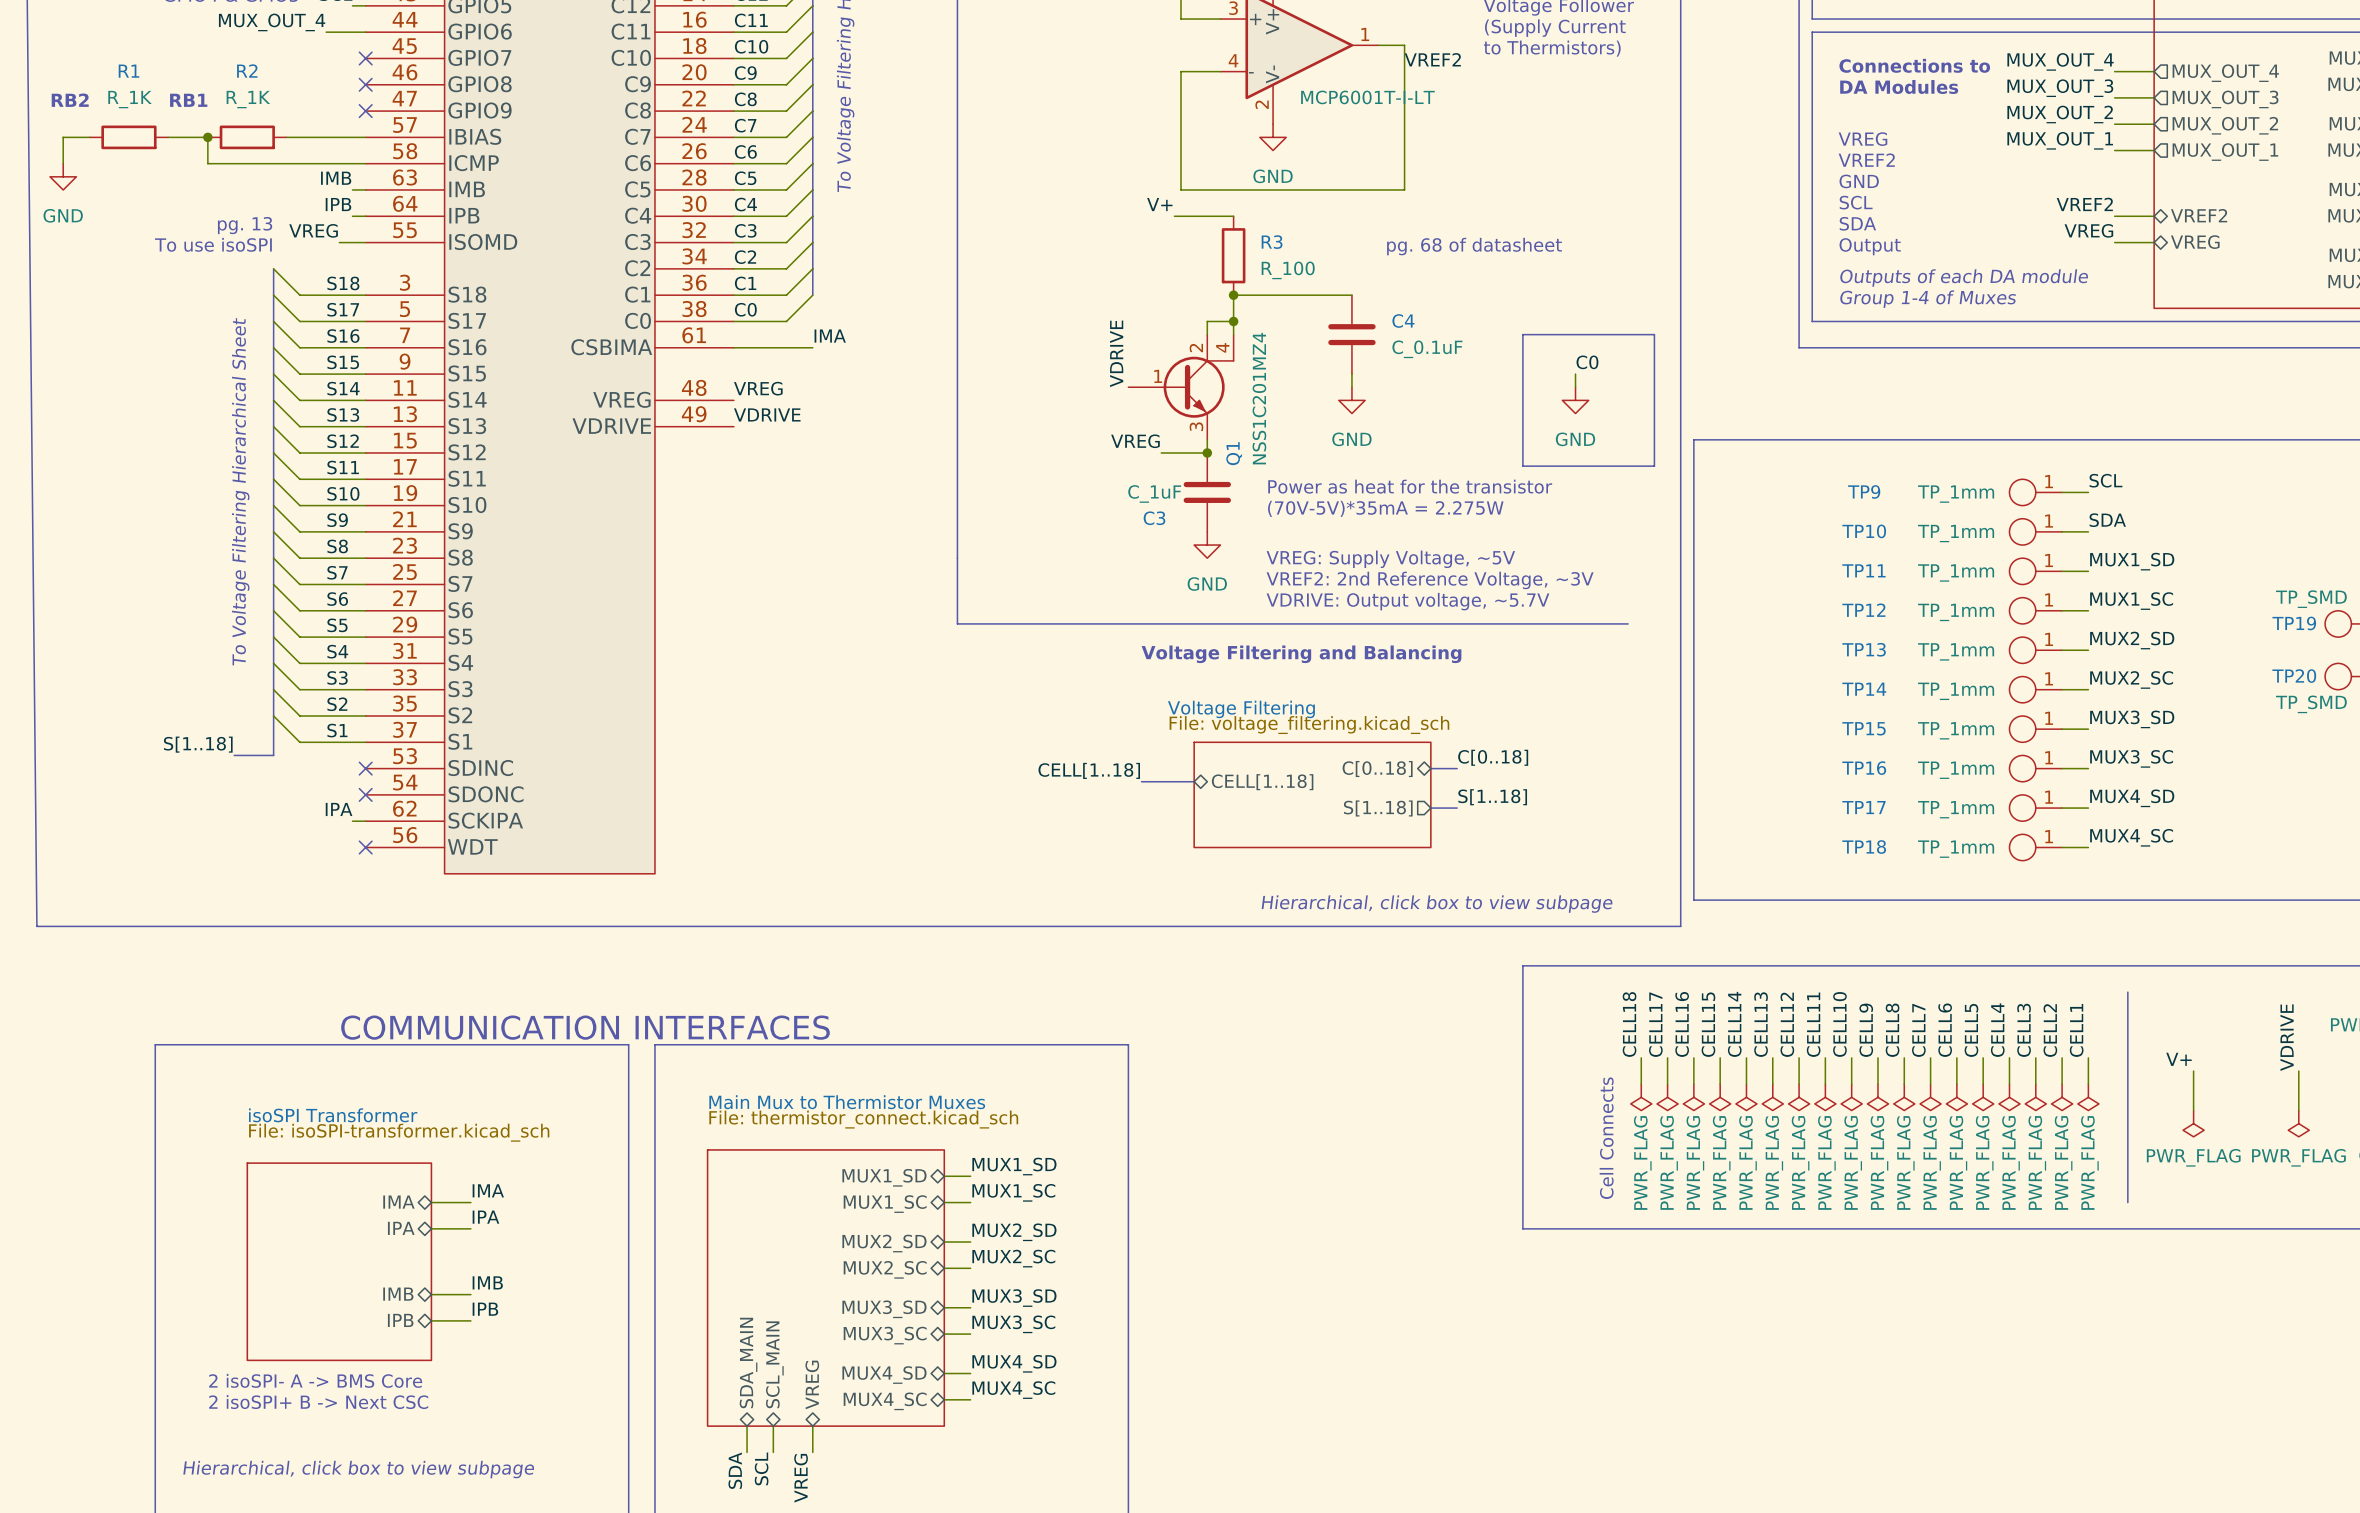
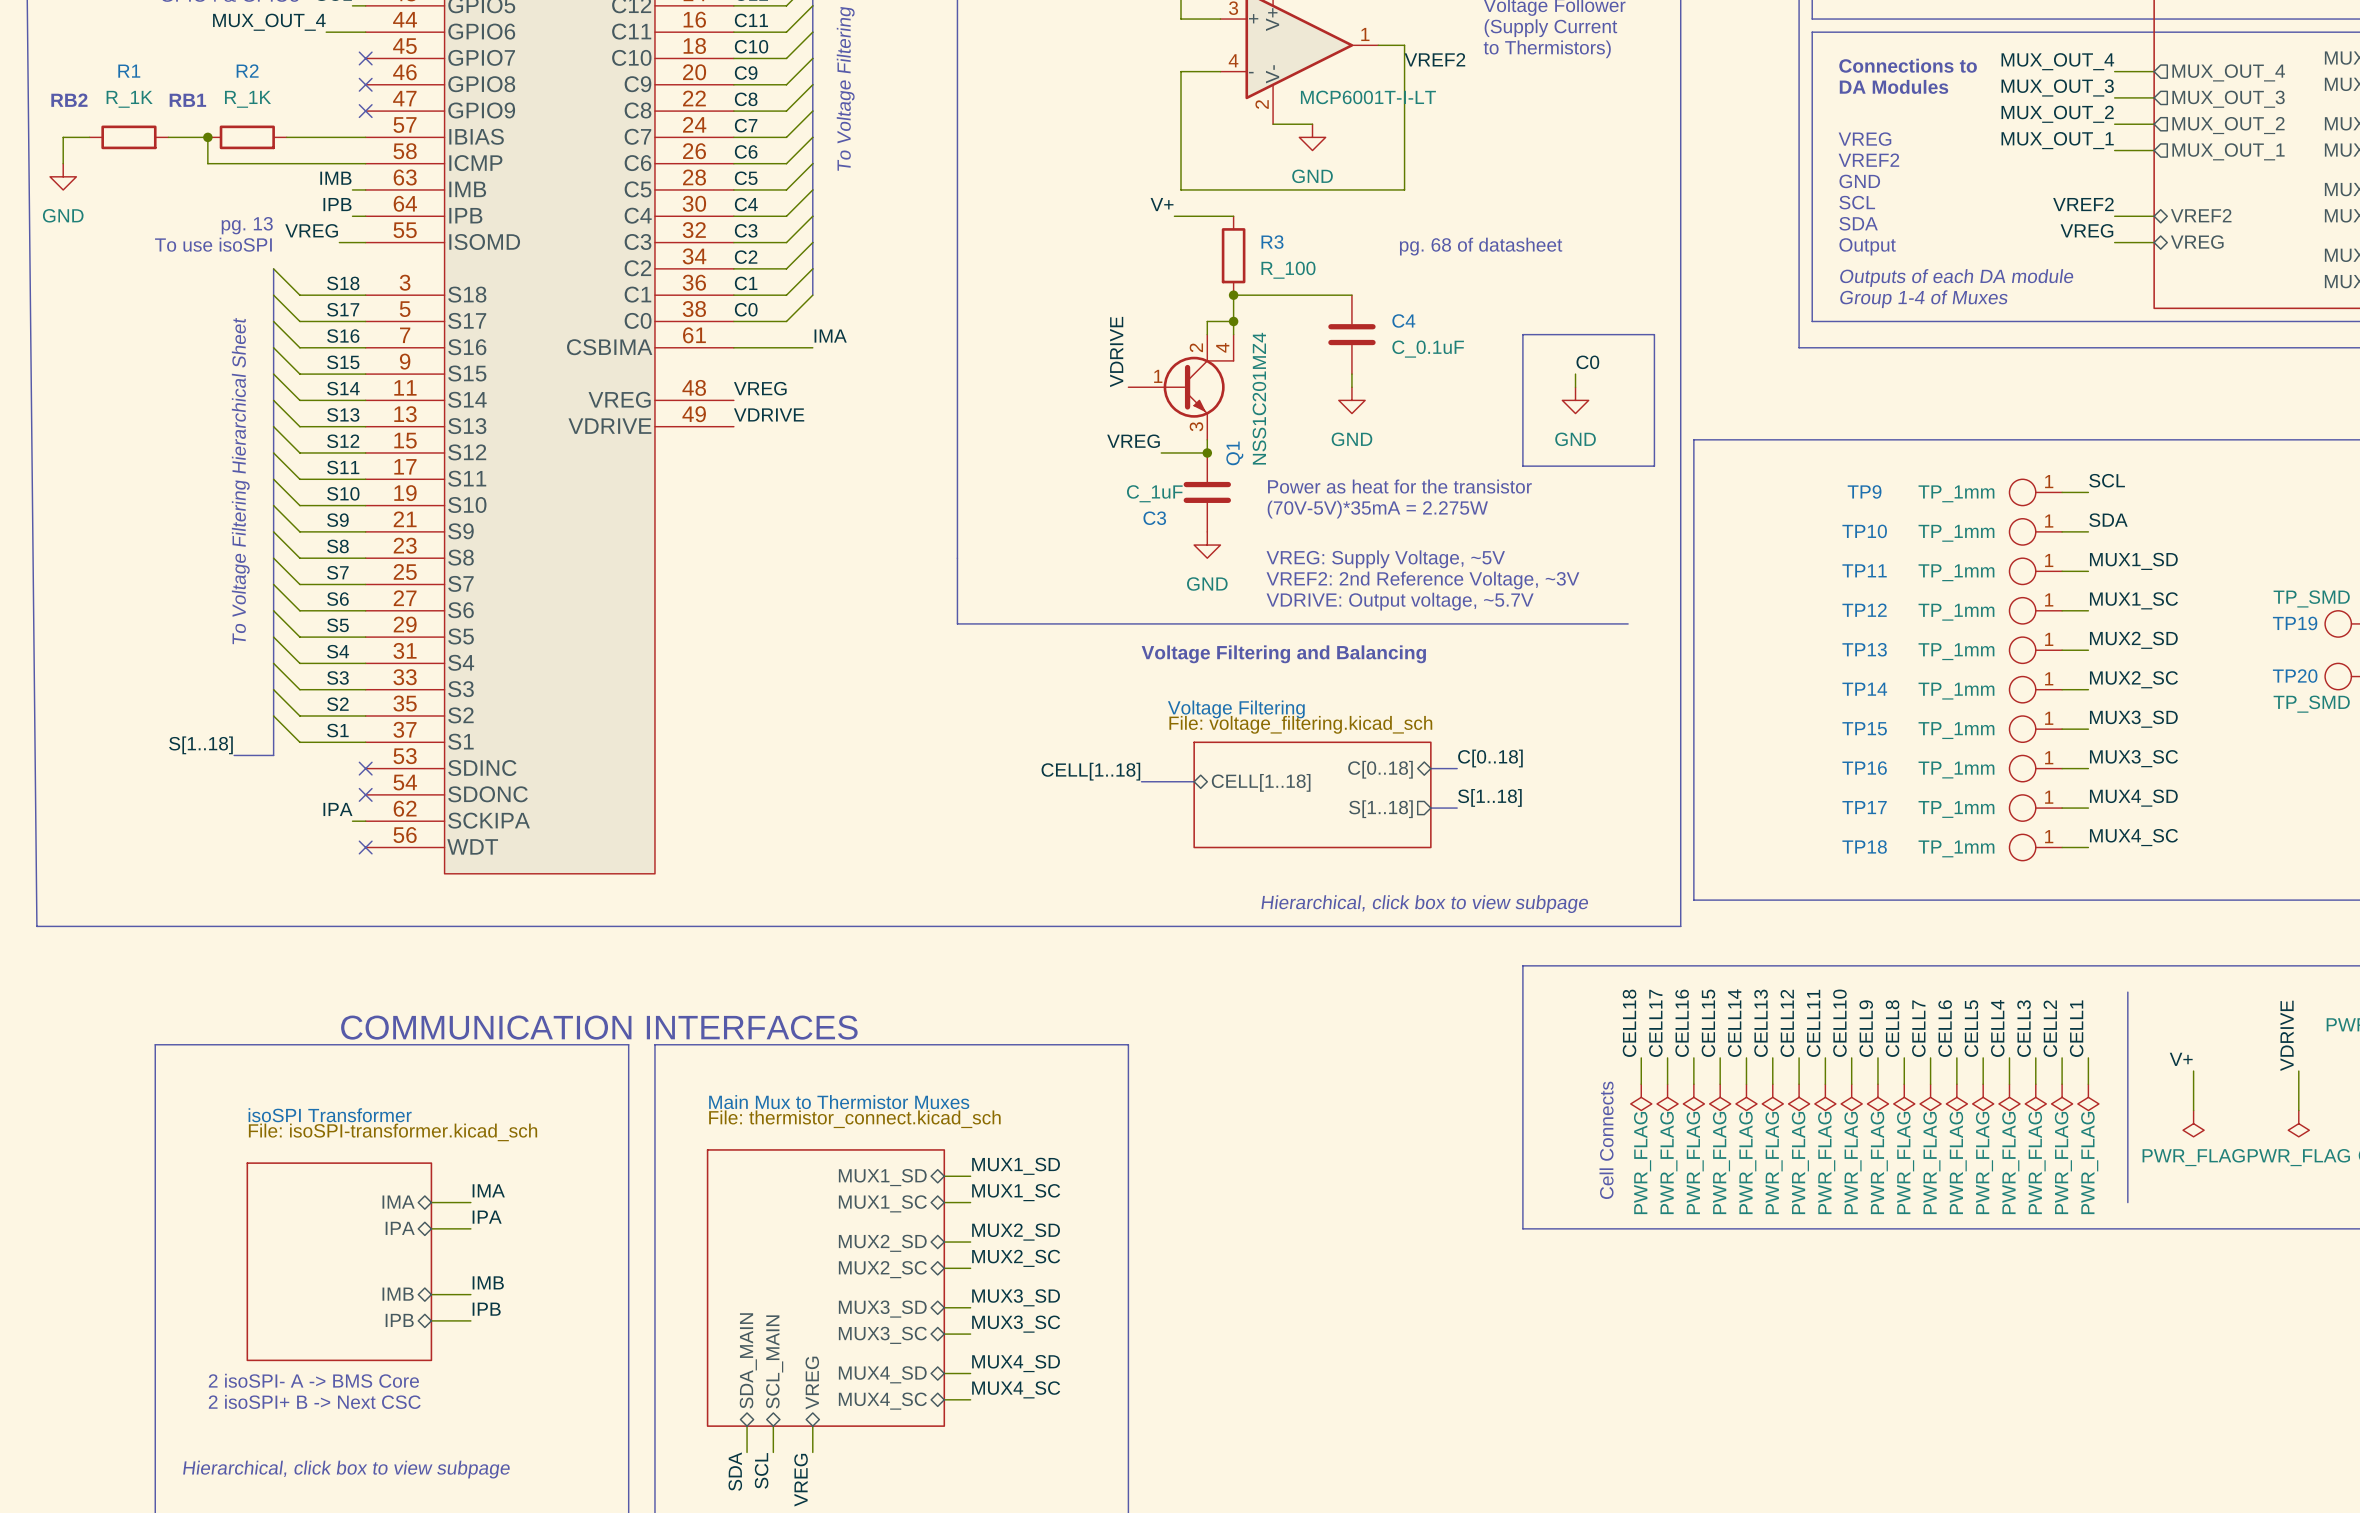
wire: none -> (1273, 124) (1312, 124)
power symbol position: GND (1273, 137) -> GND (1312, 137)

